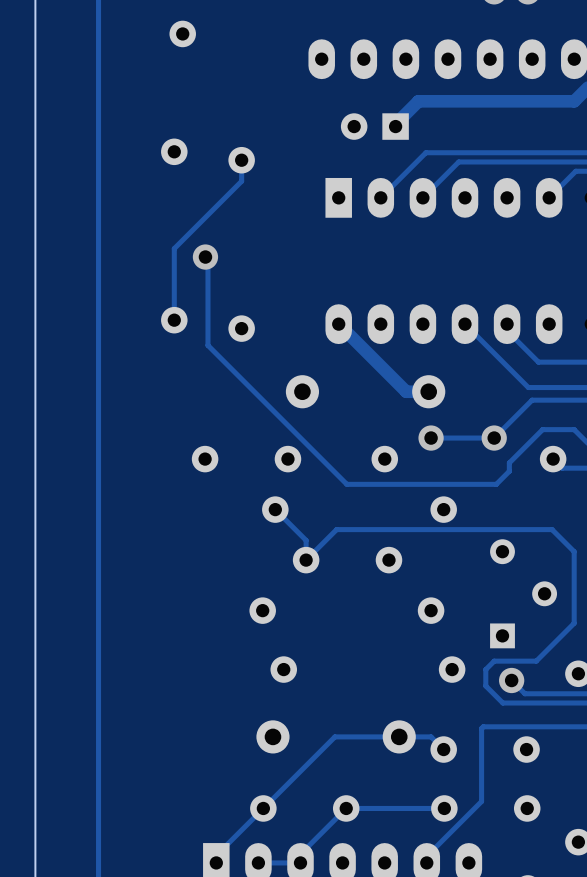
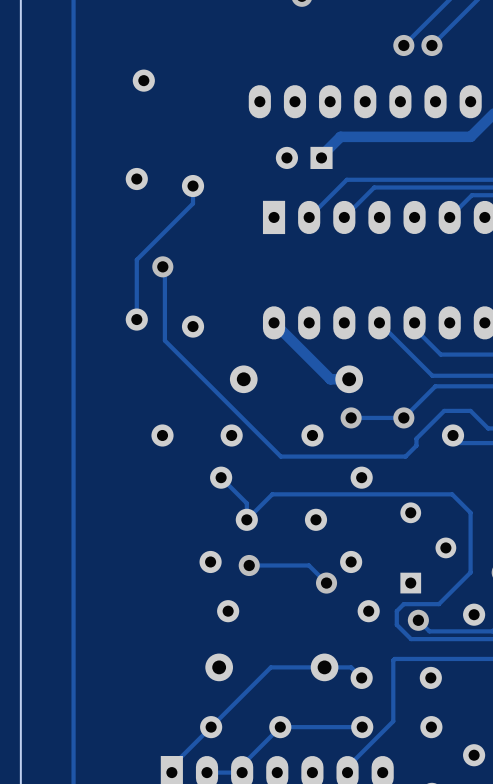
track: none -> (249, 565) (308, 565) (326, 583)
via: none -> (249, 565)
via: none -> (326, 583)

